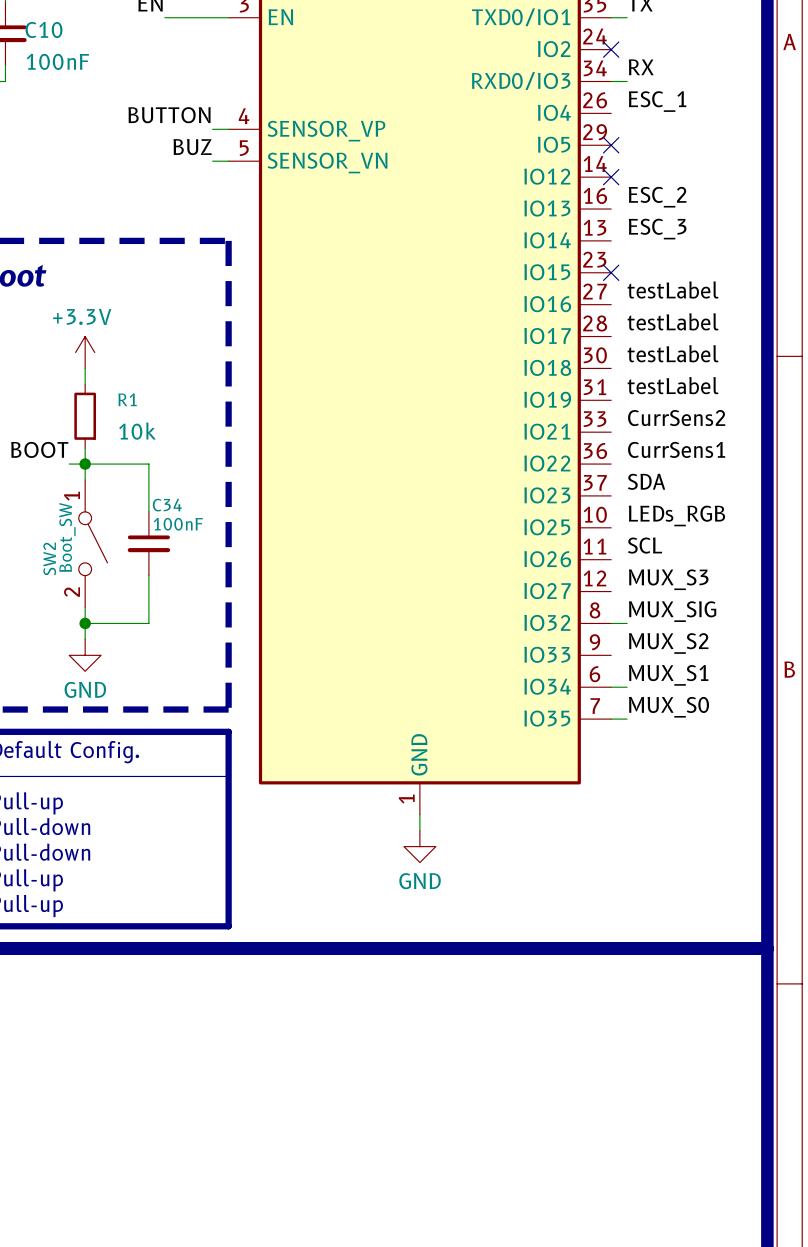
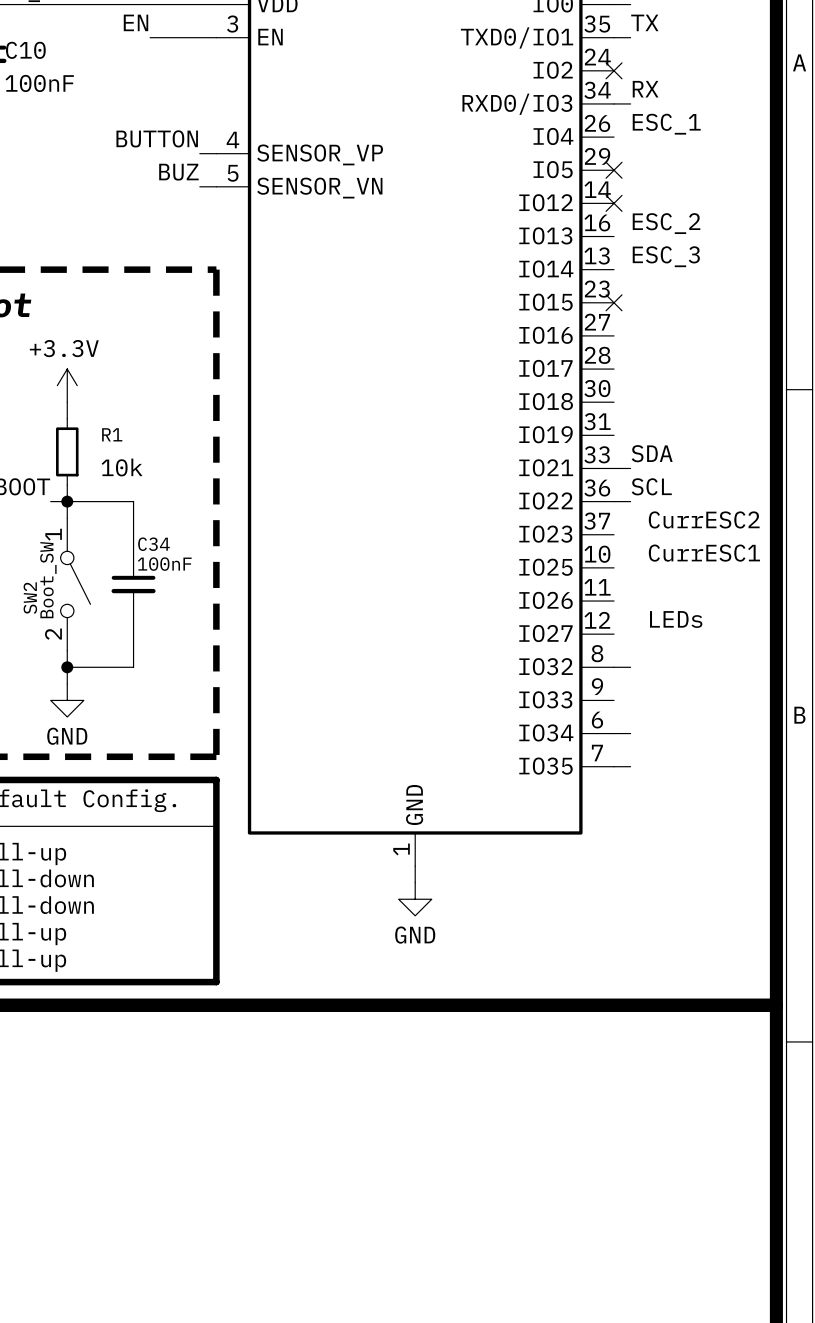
label: testLabel (673, 289) -> none
label: testLabel (673, 321) -> none
label: testLabel (673, 353) -> none
label: testLabel (673, 385) -> none
label: CurrSens2 (676, 418) -> SDA (652, 453)
wire: none -> (614, 468) (630, 468)
label: CurrSens1 (676, 449) -> SCL (651, 486)
wire: none -> (614, 501) (630, 501)
label: SDA (646, 481) -> none
label: none -> CurrESC2 (704, 519)
label: none -> CurrESC1 (704, 553)
label: LEDs_RGB (676, 515) -> none
label: SCL (645, 545) -> none
label: none -> LEDs (676, 619)
label: MUX_S3 (668, 579) -> none
label: MUX_SIG (672, 611) -> none
label: MUX_S2 (668, 643) -> none
label: MUX_S1 (668, 675) -> none
label: MUX_S0 (668, 707) -> none

